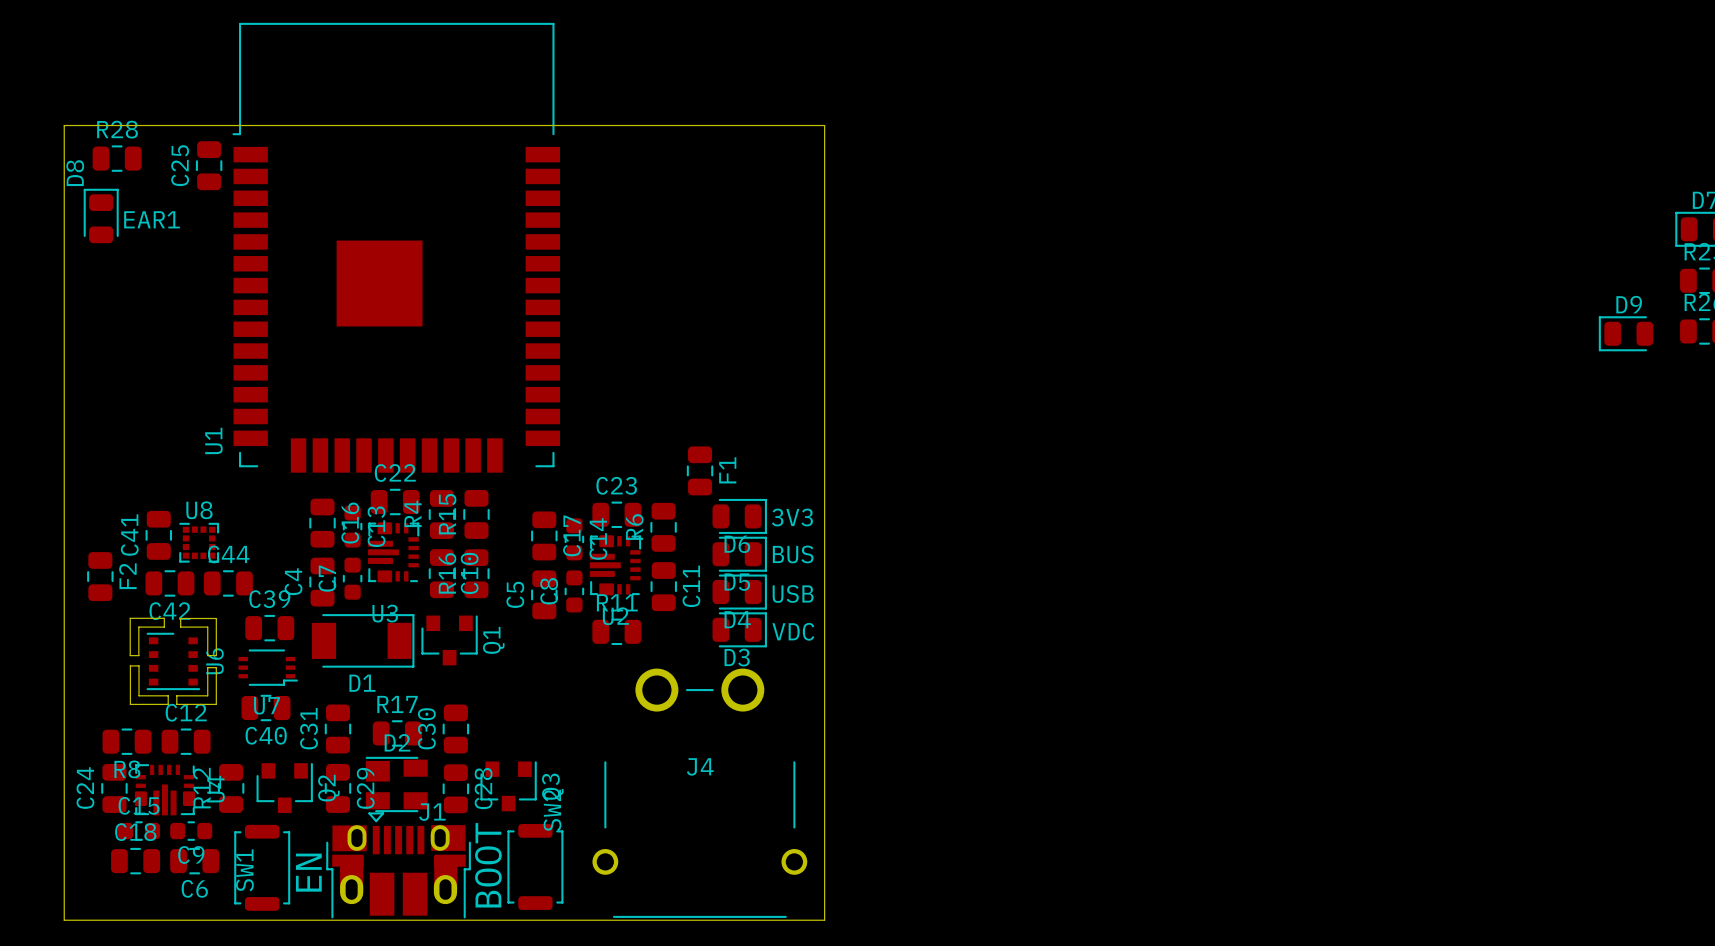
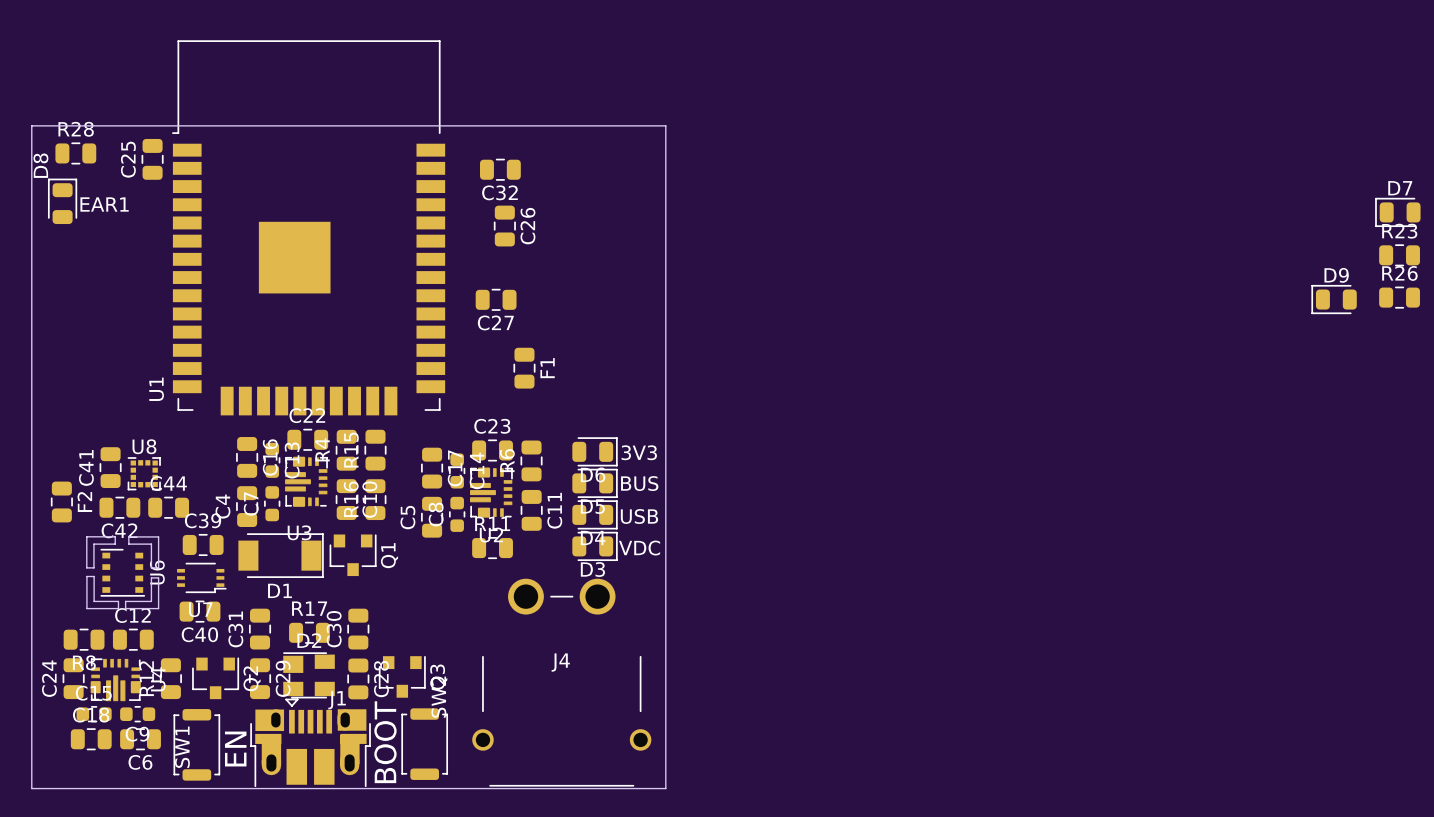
C32: none -> (500, 169)
C26: none -> (504, 226)
C27: none -> (496, 299)
F1 position: (700, 470) -> (524, 368)

